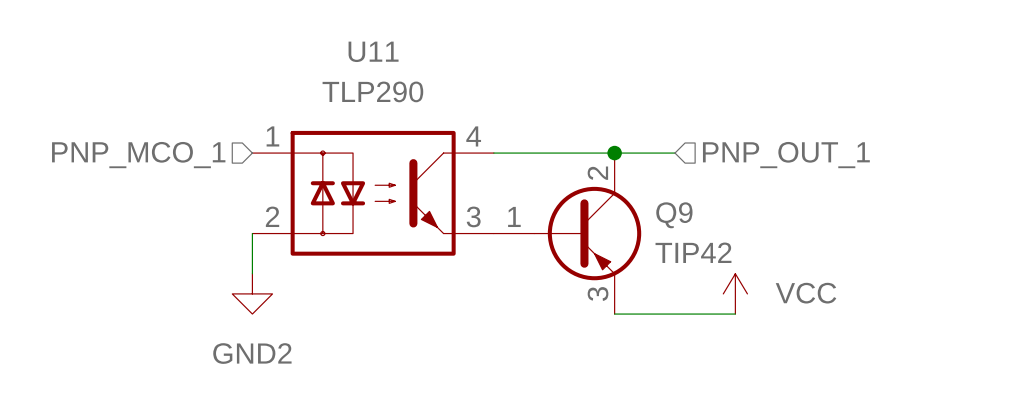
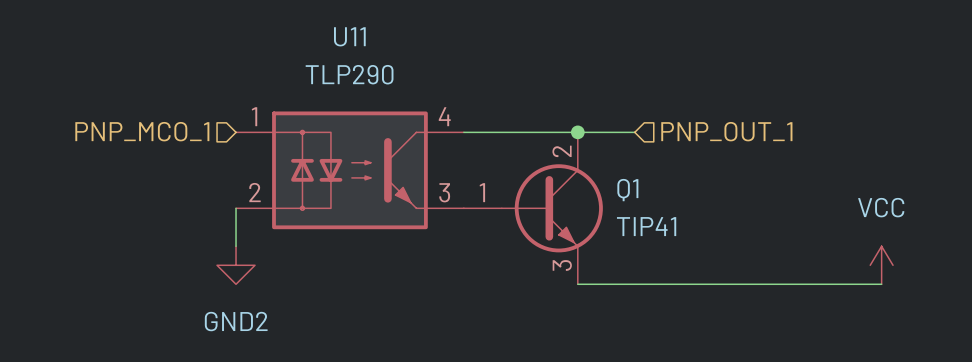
Q9: TIP42 (567, 233) -> none
Q1: none -> TIP41 (533, 208)
power symbol position: VCC (735, 293) -> VCC (881, 265)
power symbol text position: VCC (806, 293) -> VCC (881, 207)
wire: none -> (691, 284) (881, 284)

